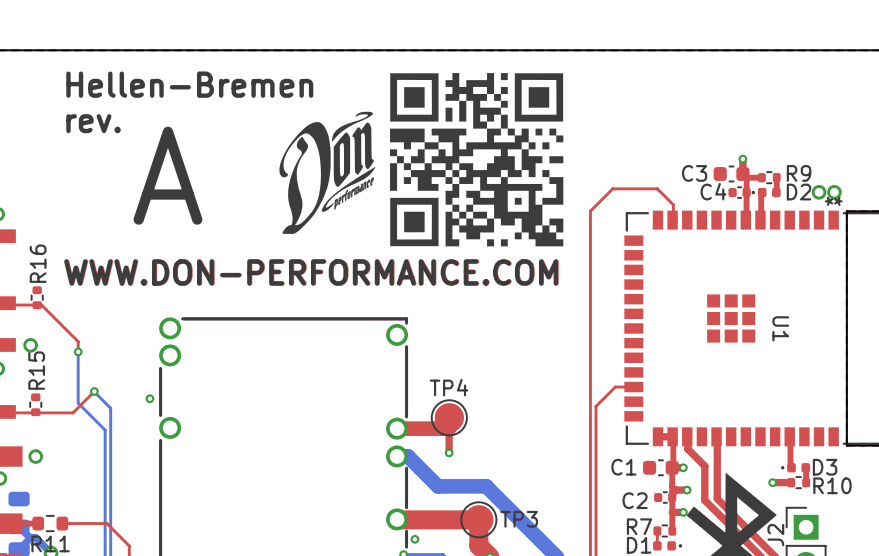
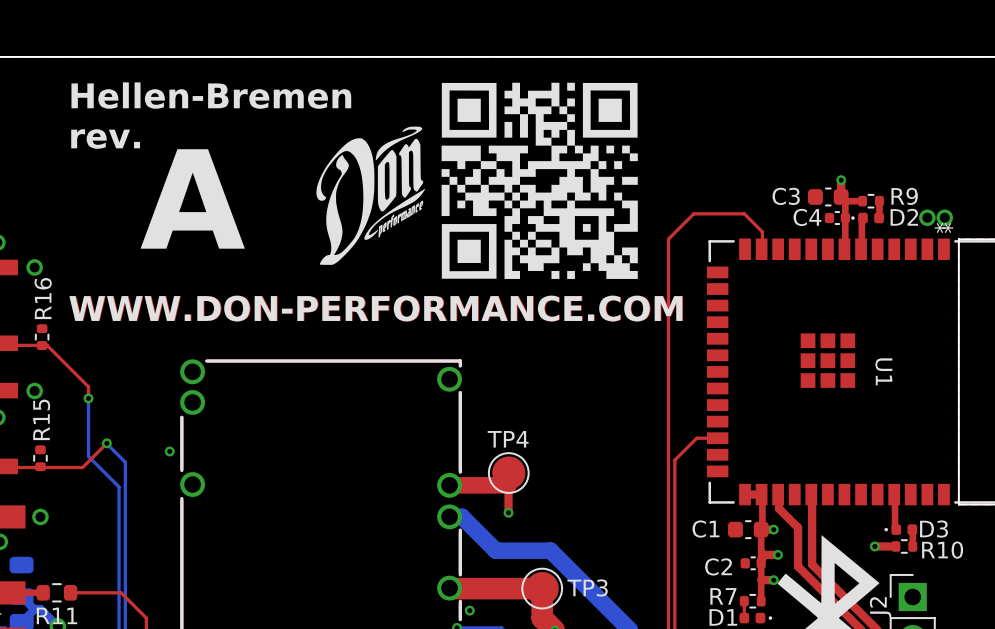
via: none -> (34, 267)

